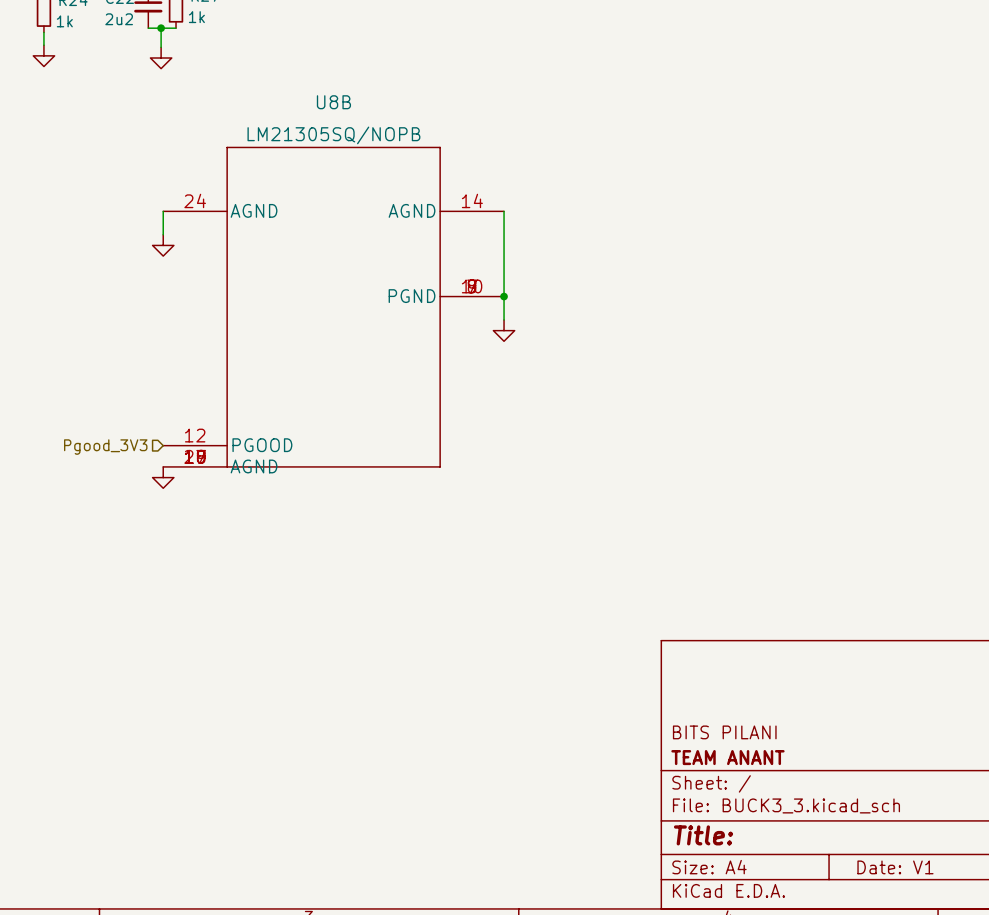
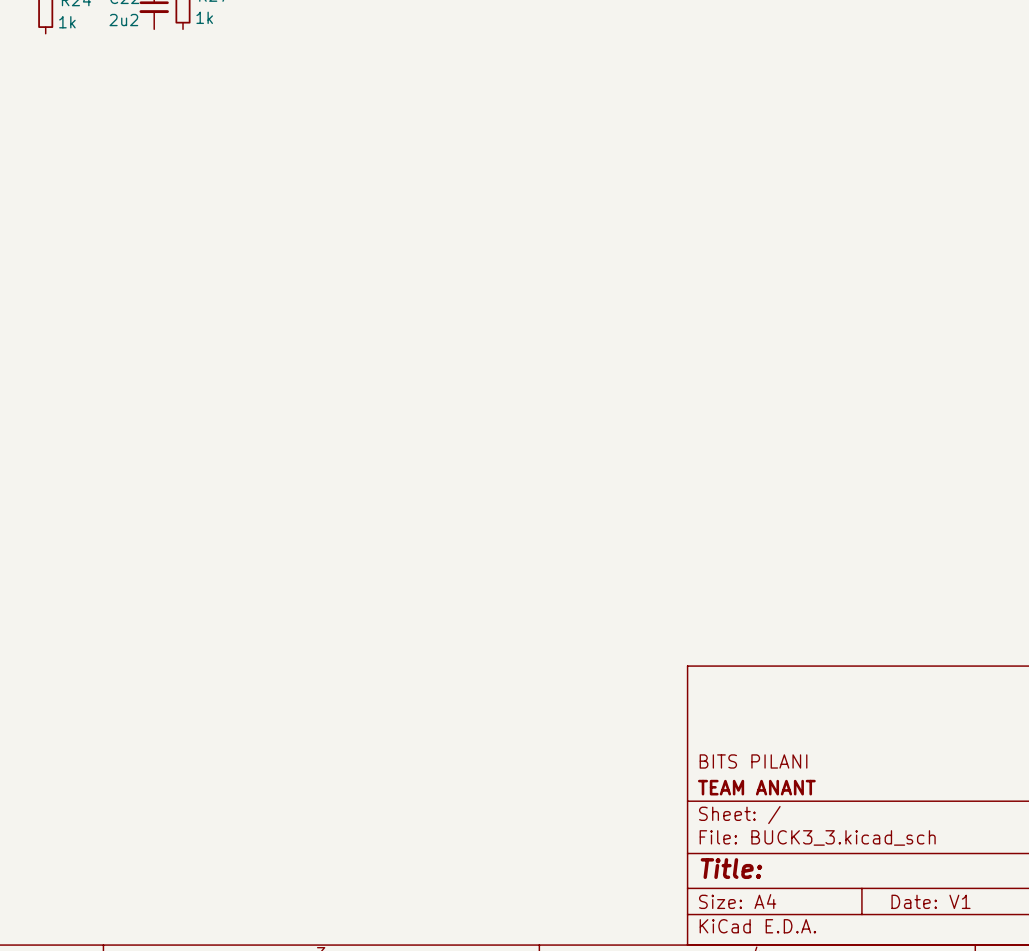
wire: (148, 28) (176, 28) -> none
wire: (161, 28) (161, 47) -> none
junction: (161, 28) -> none
wire: (43, 32) (43, 45) -> none
power symbol: (43, 55) -> none
power symbol: (161, 58) -> none
wire: (163, 211) (163, 234) -> none
wire: (504, 211) (504, 319) -> none
power symbol: (163, 245) -> none
junction: (504, 296) -> none
U8B: LM21305SQ/NOPB (333, 307) -> none
power symbol: (504, 330) -> none
hierarchical label: Pgood_3V3 (105, 447) -> none
power symbol: (163, 477) -> none

